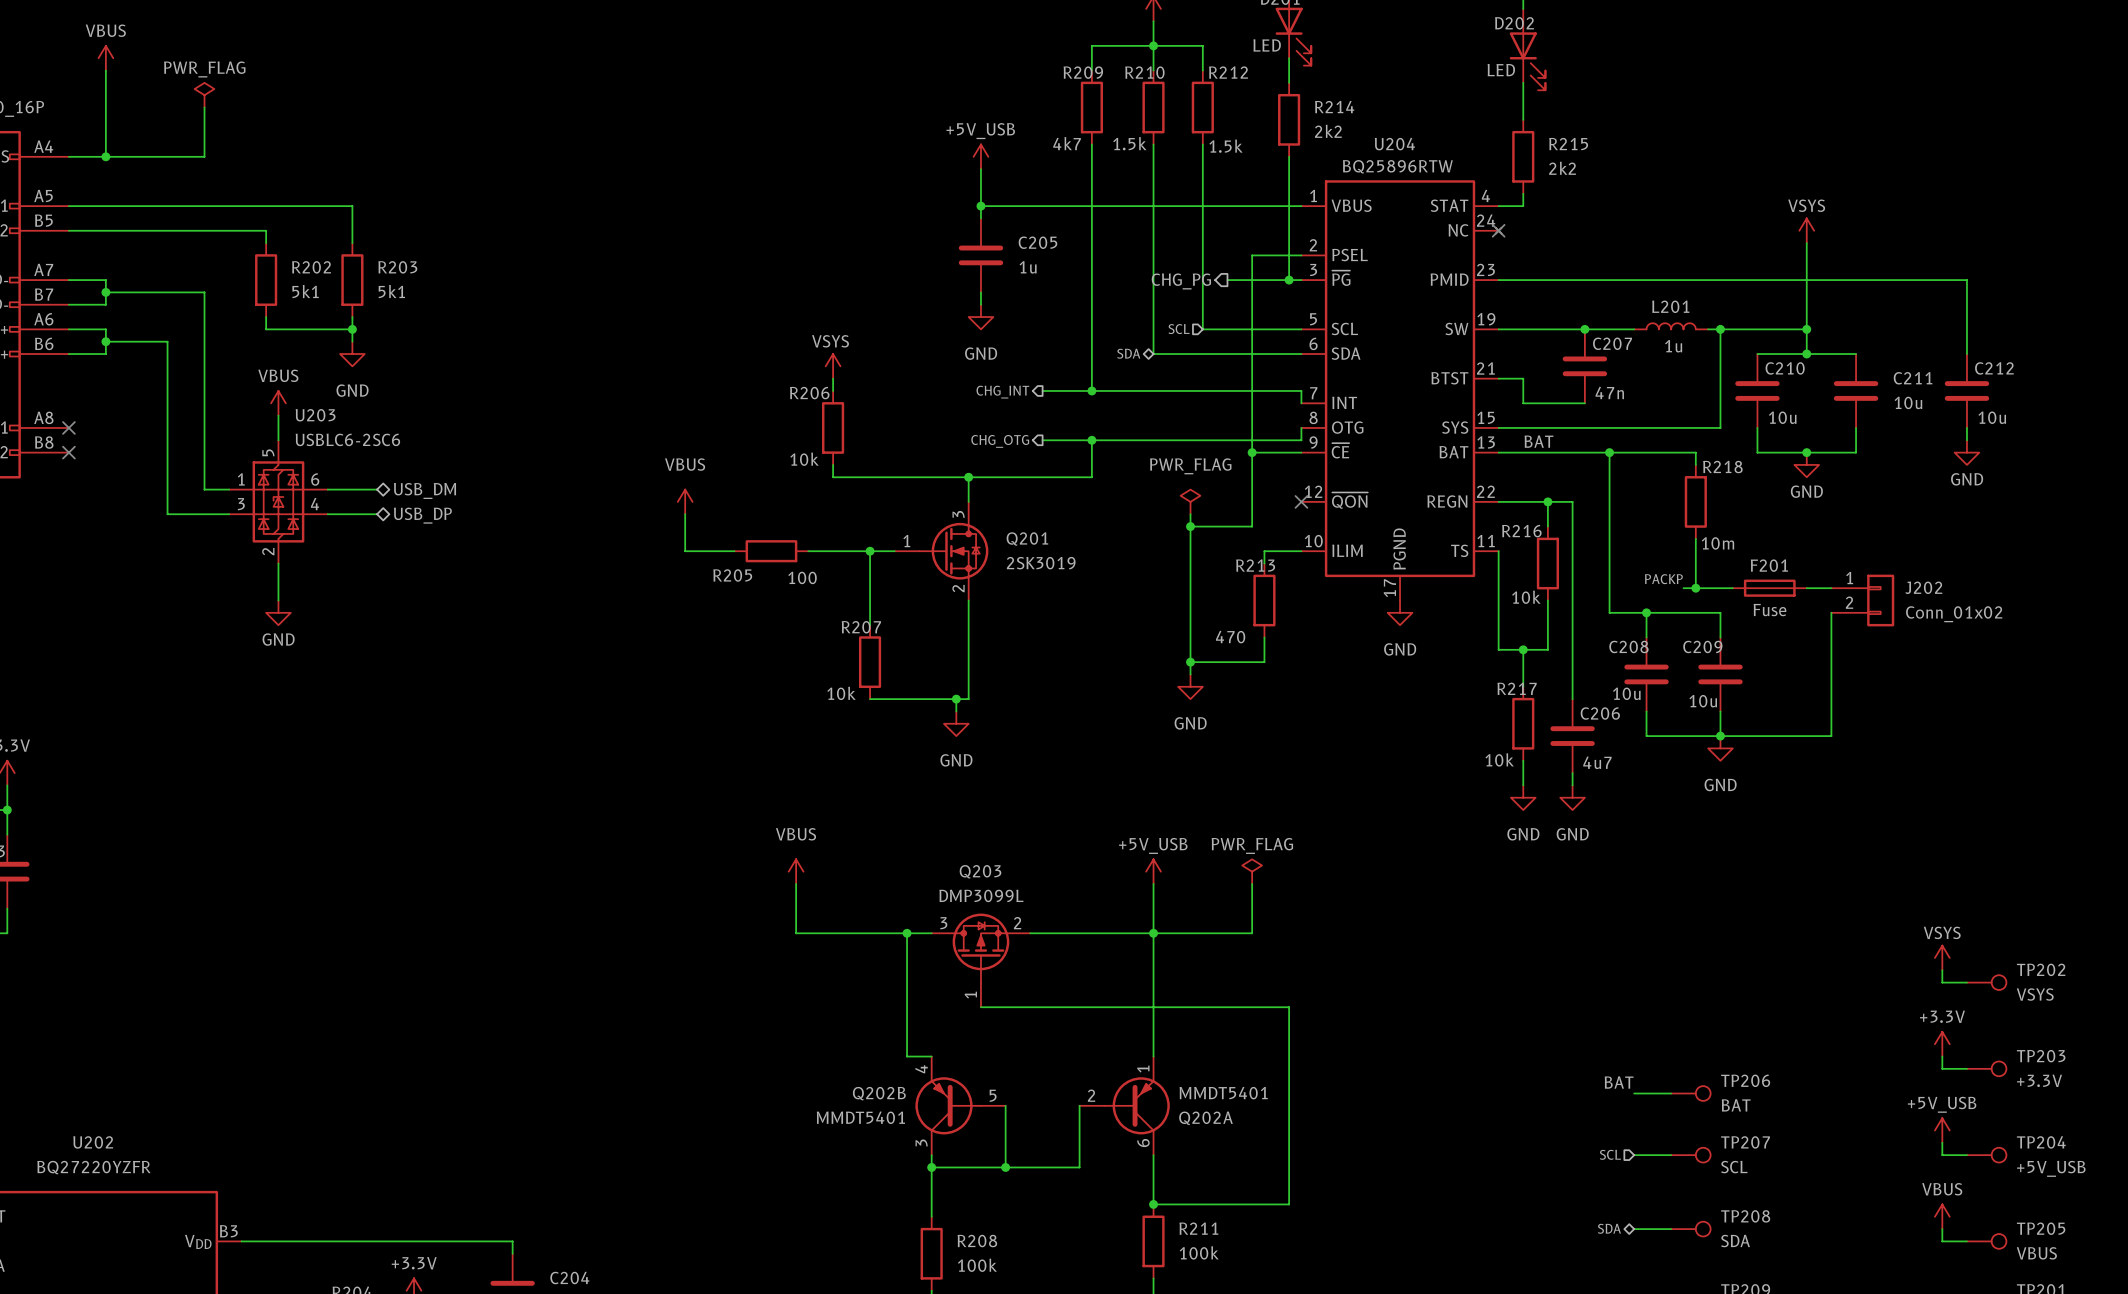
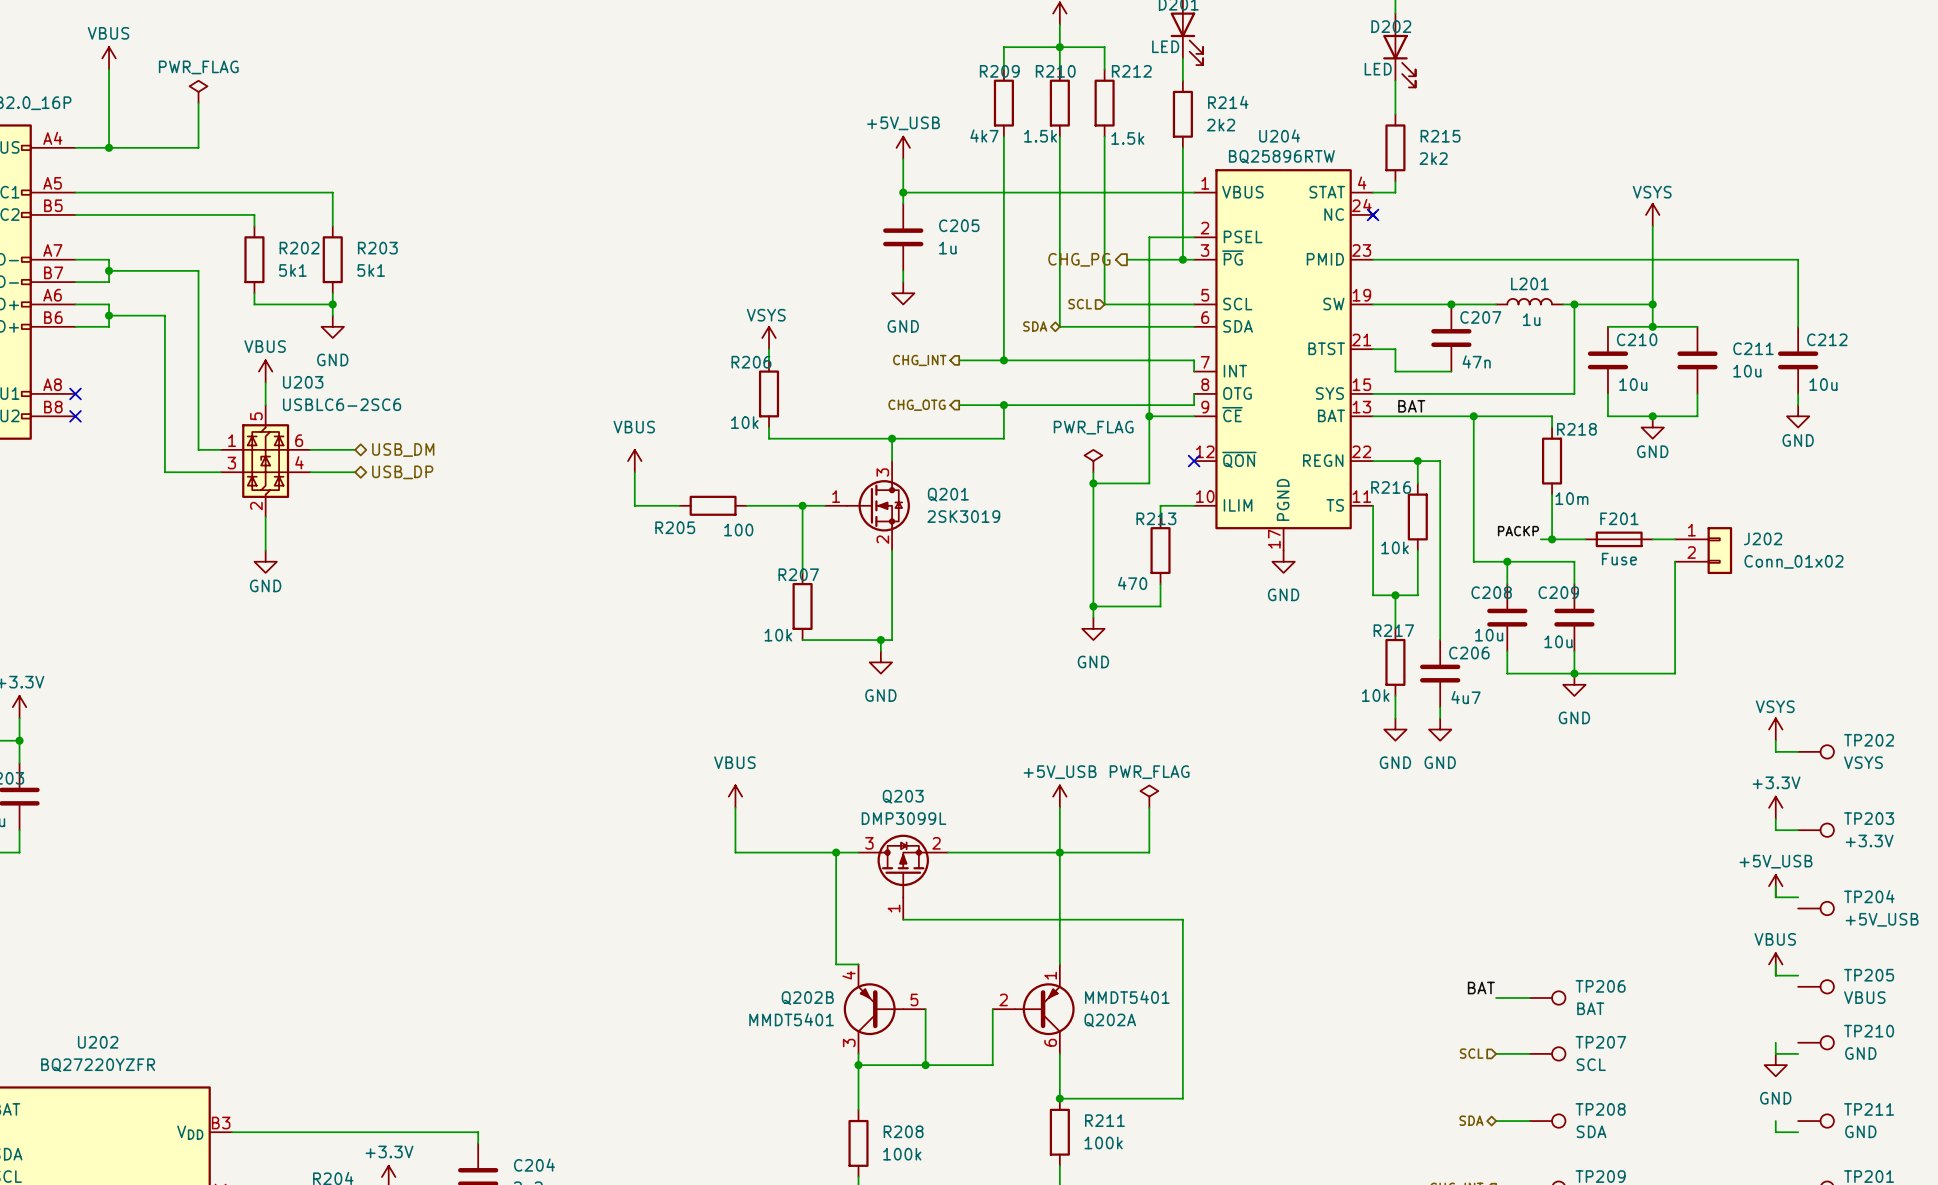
wire: none -> (1775, 740) (1775, 751) (1798, 751)
wire: none -> (1775, 819) (1775, 830) (1798, 830)
power symbol position: VSYS (1942, 957) -> VSYS (1775, 729)
TP202 position: (1986, 982) -> (1816, 751)
power symbol position: +3.3V (1942, 1044) -> +3.3V (1775, 807)
TP203 position: (1986, 1068) -> (1816, 830)
power symbol position: +5V_USB (1942, 1130) -> +5V_USB (1775, 886)
TP210: none -> GND (1816, 1042)
TP204 position: (1986, 1155) -> (1816, 908)
power symbol: none -> GND (1775, 1065)
power symbol position: VBUS (1942, 1216) -> VBUS (1775, 964)
TP211: none -> GND (1816, 1121)
TP205 position: (1986, 1241) -> (1816, 986)

